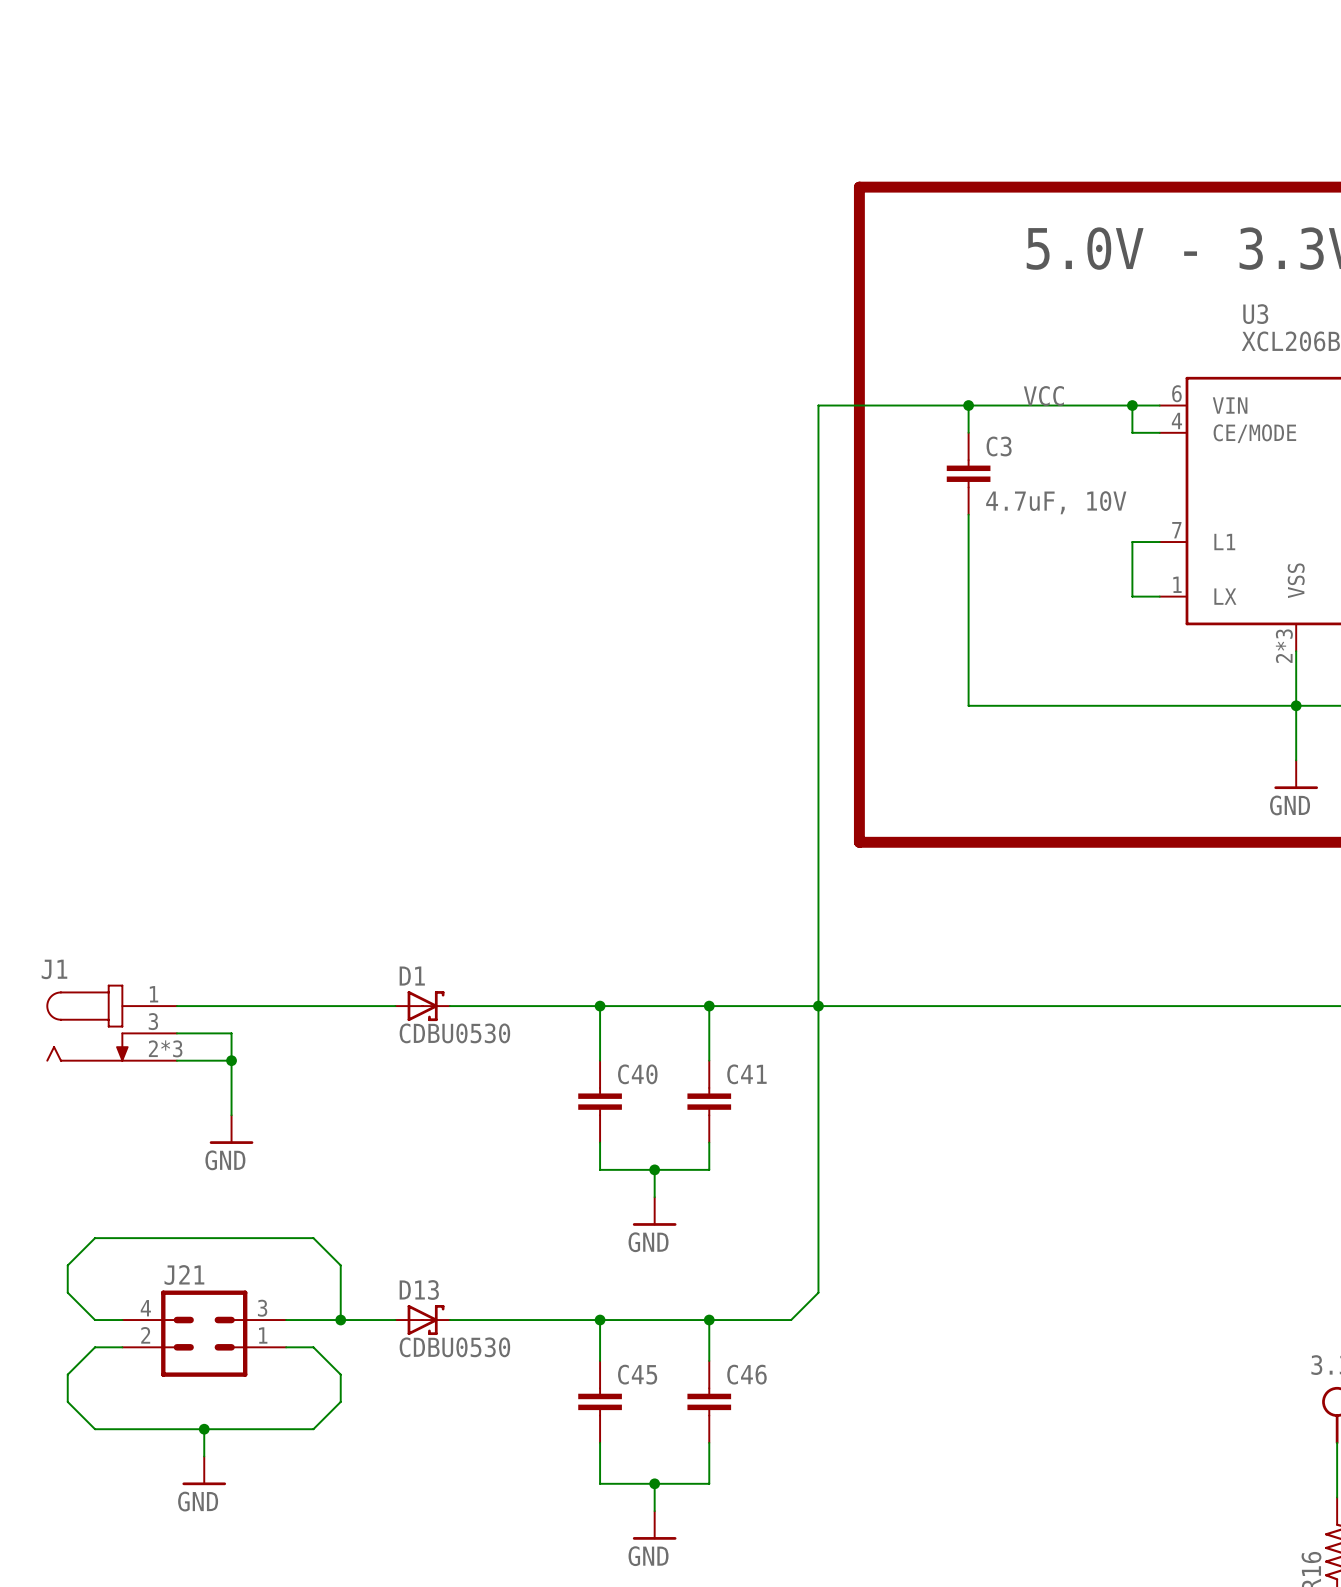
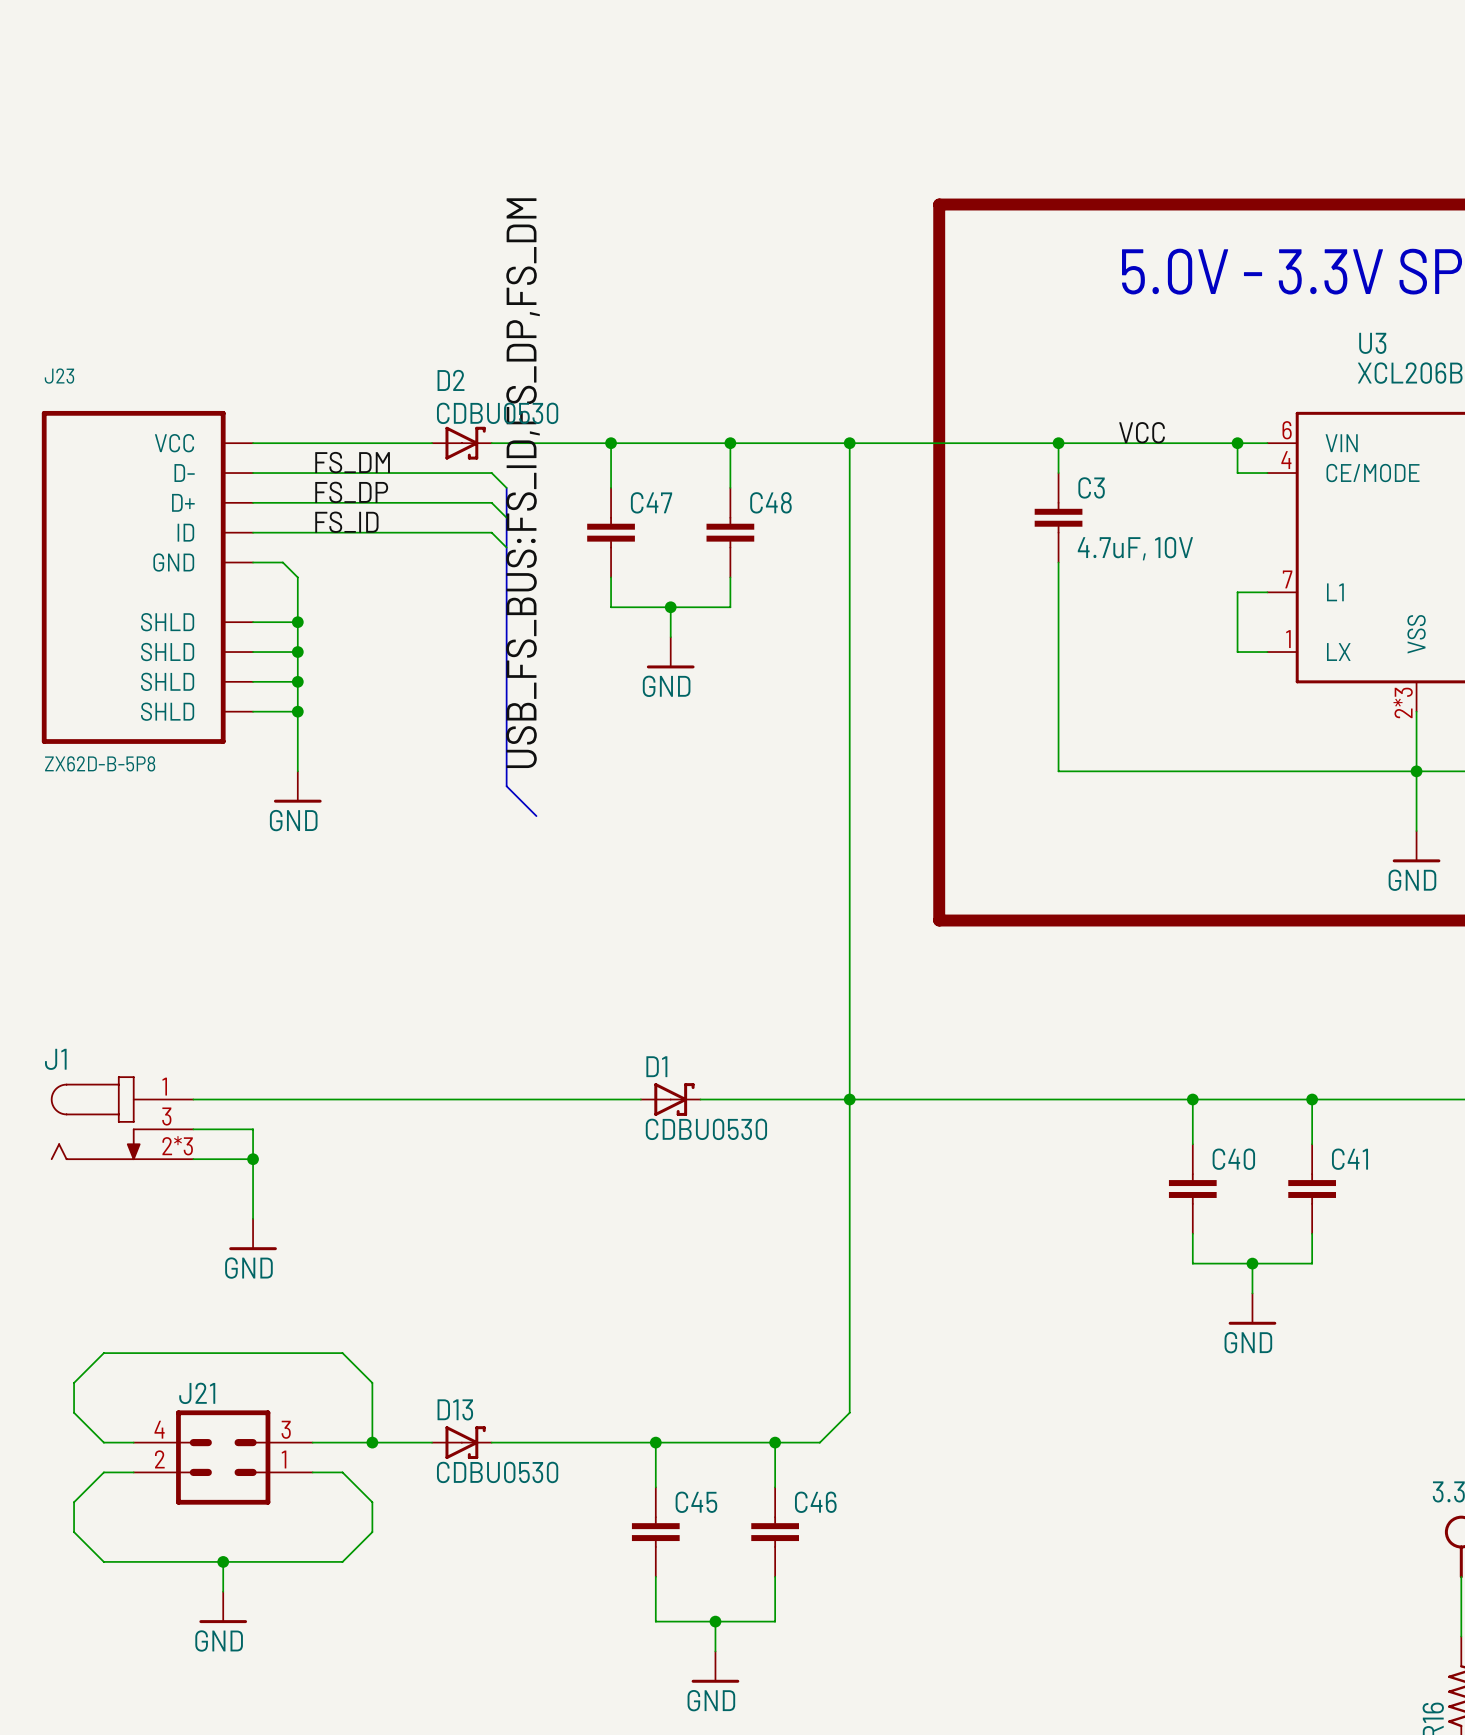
wire: none -> (253, 443) (432, 443)
D2: none -> CDBU0530 (461, 443)
wire: none -> (491, 443) (894, 443)
wire: none -> (611, 443) (611, 487)
junction: none -> (611, 443)
wire: none -> (730, 443) (730, 487)
junction: none -> (730, 443)
junction: none -> (849, 443)
wire: (818, 405) (818, 1292) (791, 1320) (750, 1320) -> (849, 443) (849, 1412) (819, 1442)
label: none -> USB_FS_BUS:FS_ID,FS_DP,FS_DM (523, 483)
label: none -> FS_DM (352, 462)
wire: none -> (253, 473) (491, 473) (506, 487)
bus: none -> (506, 487) (506, 786) (536, 816)
label: none -> FS_DP (351, 492)
wire: none -> (253, 502) (491, 502) (506, 517)
label: none -> FS_ID (346, 522)
wire: none -> (253, 532) (491, 532) (506, 547)
C47: none -> (611, 532)
C48: none -> (730, 532)
wire: none -> (253, 562) (282, 562) (297, 577) (297, 771)
J23: none -> ZX62D-B-5P8 (147, 577)
wire: none -> (611, 577) (611, 607) (730, 607) (730, 577)
wire: none -> (670, 607) (670, 637)
junction: none -> (670, 607)
wire: none -> (253, 622) (297, 622)
junction: none -> (297, 622)
wire: none -> (253, 652) (297, 652)
junction: none -> (297, 652)
power symbol: none -> GND (670, 652)
wire: none -> (253, 681) (297, 681)
junction: none -> (297, 681)
wire: none -> (253, 711) (297, 711)
junction: none -> (297, 711)
power symbol: none -> GND (297, 787)
D1 position: (422, 1006) -> (670, 1099)
wire: (600, 1006) (600, 1060) -> none
junction: (600, 1006) -> none
wire: (709, 1006) (709, 1060) -> none
junction: (709, 1006) -> none
junction: none -> (849, 1099)
junction: (818, 1006) -> none
wire: none -> (1192, 1099) (1192, 1144)
junction: none -> (1192, 1099)
wire: none -> (1312, 1099) (1312, 1144)
junction: none -> (1312, 1099)
C40 position: (600, 1101) -> (1192, 1189)
C41 position: (709, 1101) -> (1312, 1189)
wire: none -> (1192, 1233) (1192, 1263) (1312, 1263) (1312, 1233)
wire: (600, 1142) (600, 1169) (709, 1169) (709, 1142) -> none
wire: none -> (1252, 1263) (1252, 1293)
junction: none -> (1252, 1263)
wire: (654, 1169) (654, 1197) -> none
junction: (654, 1169) -> none
power symbol: none -> GND (1252, 1309)
power symbol: GND (654, 1211) -> none

